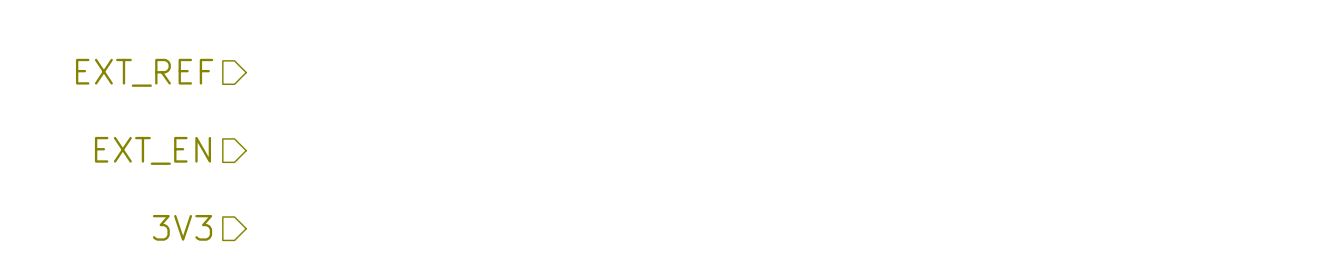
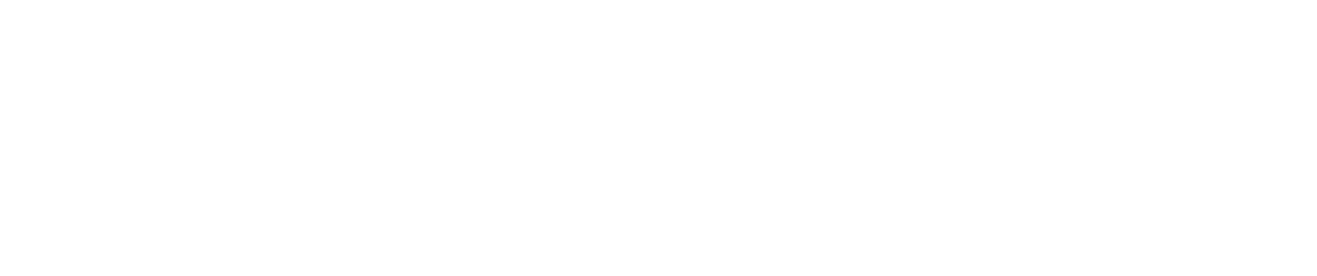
hierarchical label: EXT_REF (144, 72) -> none
hierarchical label: EXT_EN (152, 150) -> none
hierarchical label: 3V3 (182, 227) -> none

